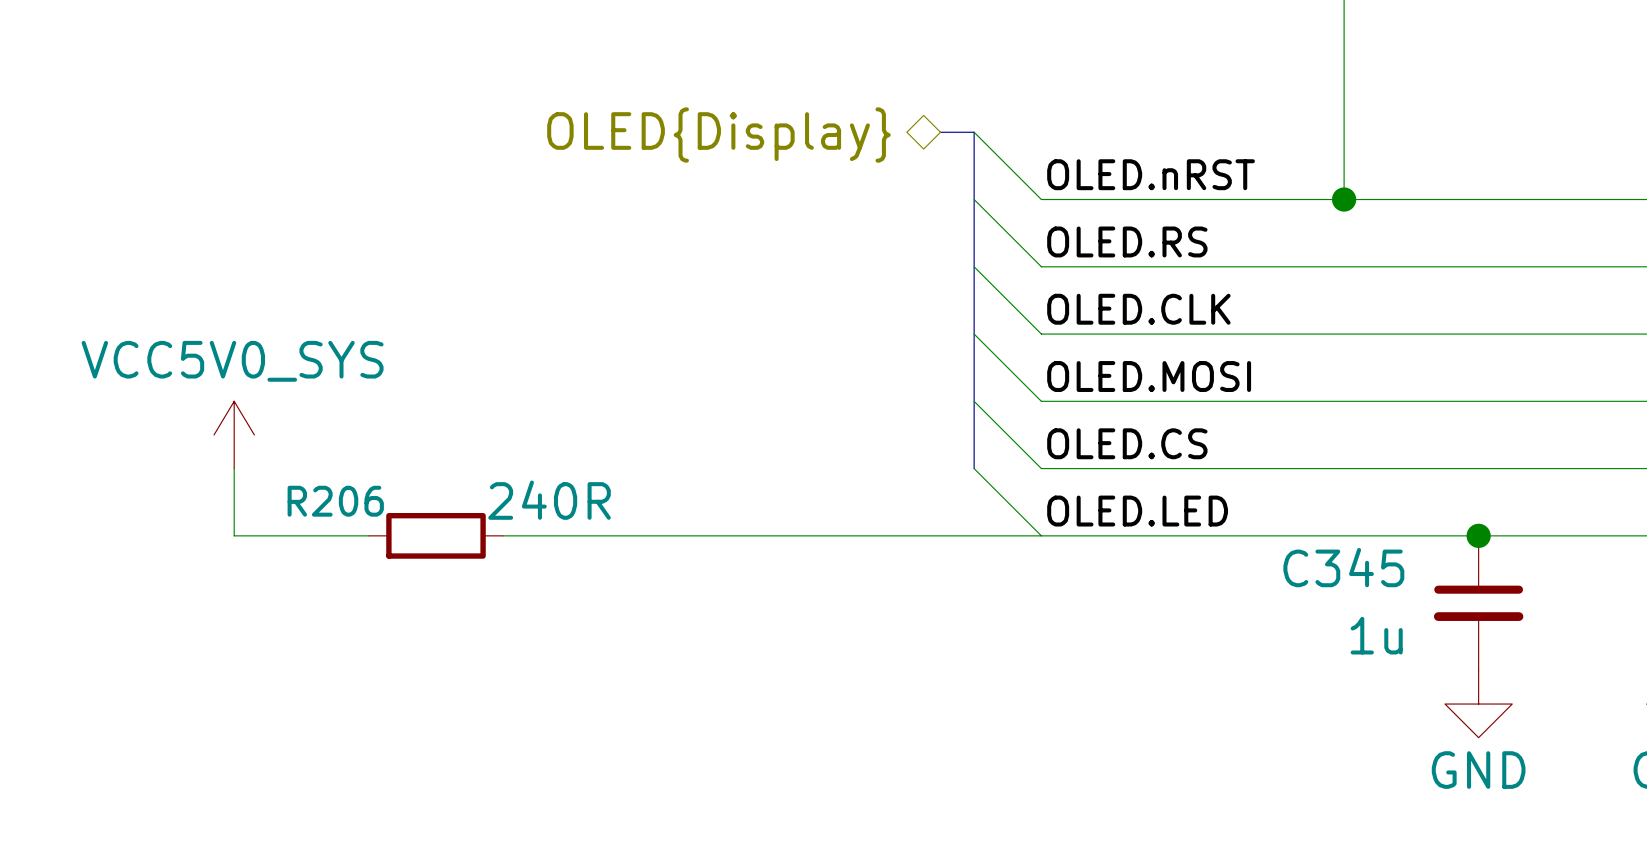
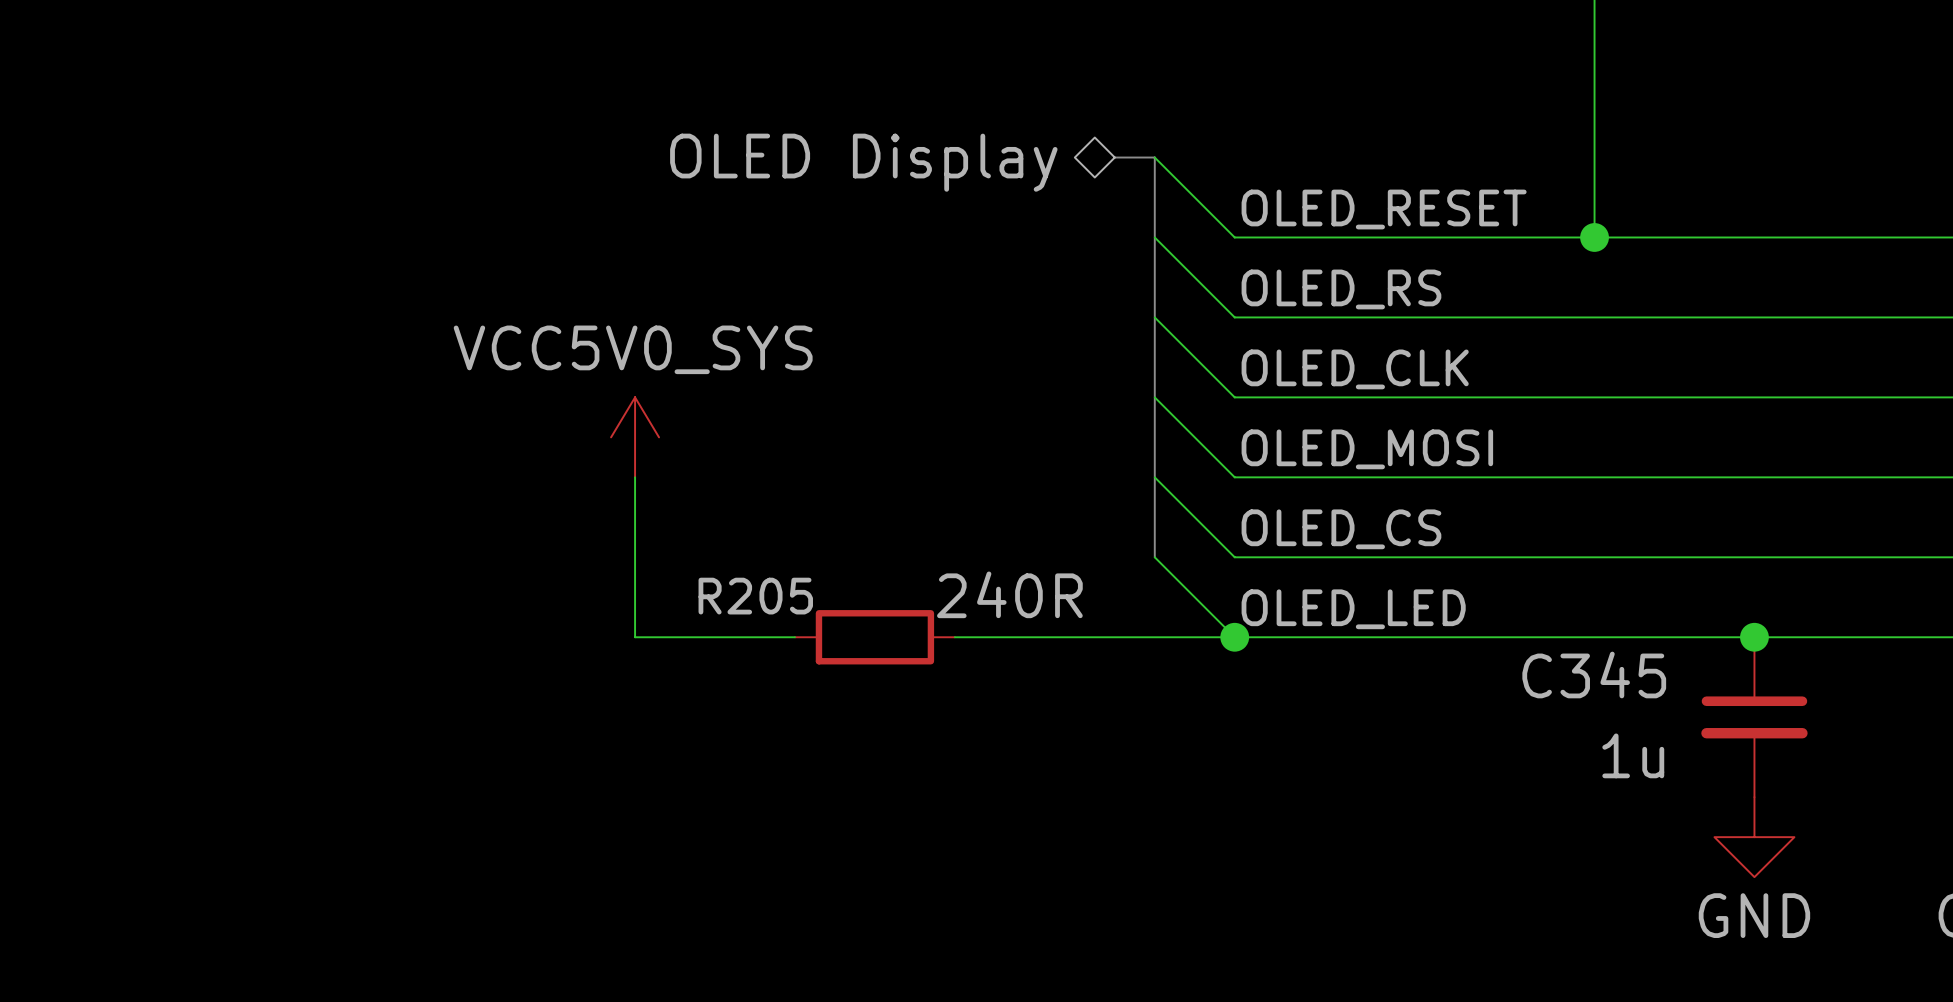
hierarchical label: OLED{Display} (718, 135) -> OLED Display (863, 162)
label: OLED.nRST (1151, 174) -> OLED_RESET (1384, 209)
label: OLED.RS (1127, 241) -> OLED_RS (1341, 289)
label: OLED.CLK (1138, 309) -> OLED_CLK (1355, 369)
label: OLED.MOSI (1149, 376) -> OLED_MOSI (1367, 449)
power symbol position: VCC5V0_SYS (234, 434) -> VCC5V0_SYS (635, 437)
label: OLED.CS (1127, 443) -> OLED_CS (1341, 529)
wire: (234, 468) (234, 535) (368, 535) -> none
label: OLED.LED (1137, 511) -> OLED_LED (1353, 609)
R206: 240R (435, 535) -> none
wire: (503, 535) (536, 535) -> (635, 477) (635, 637)
wire: (671, 535) (805, 535) -> none
R205: none -> 240R (874, 637)
junction: none -> (1234, 637)

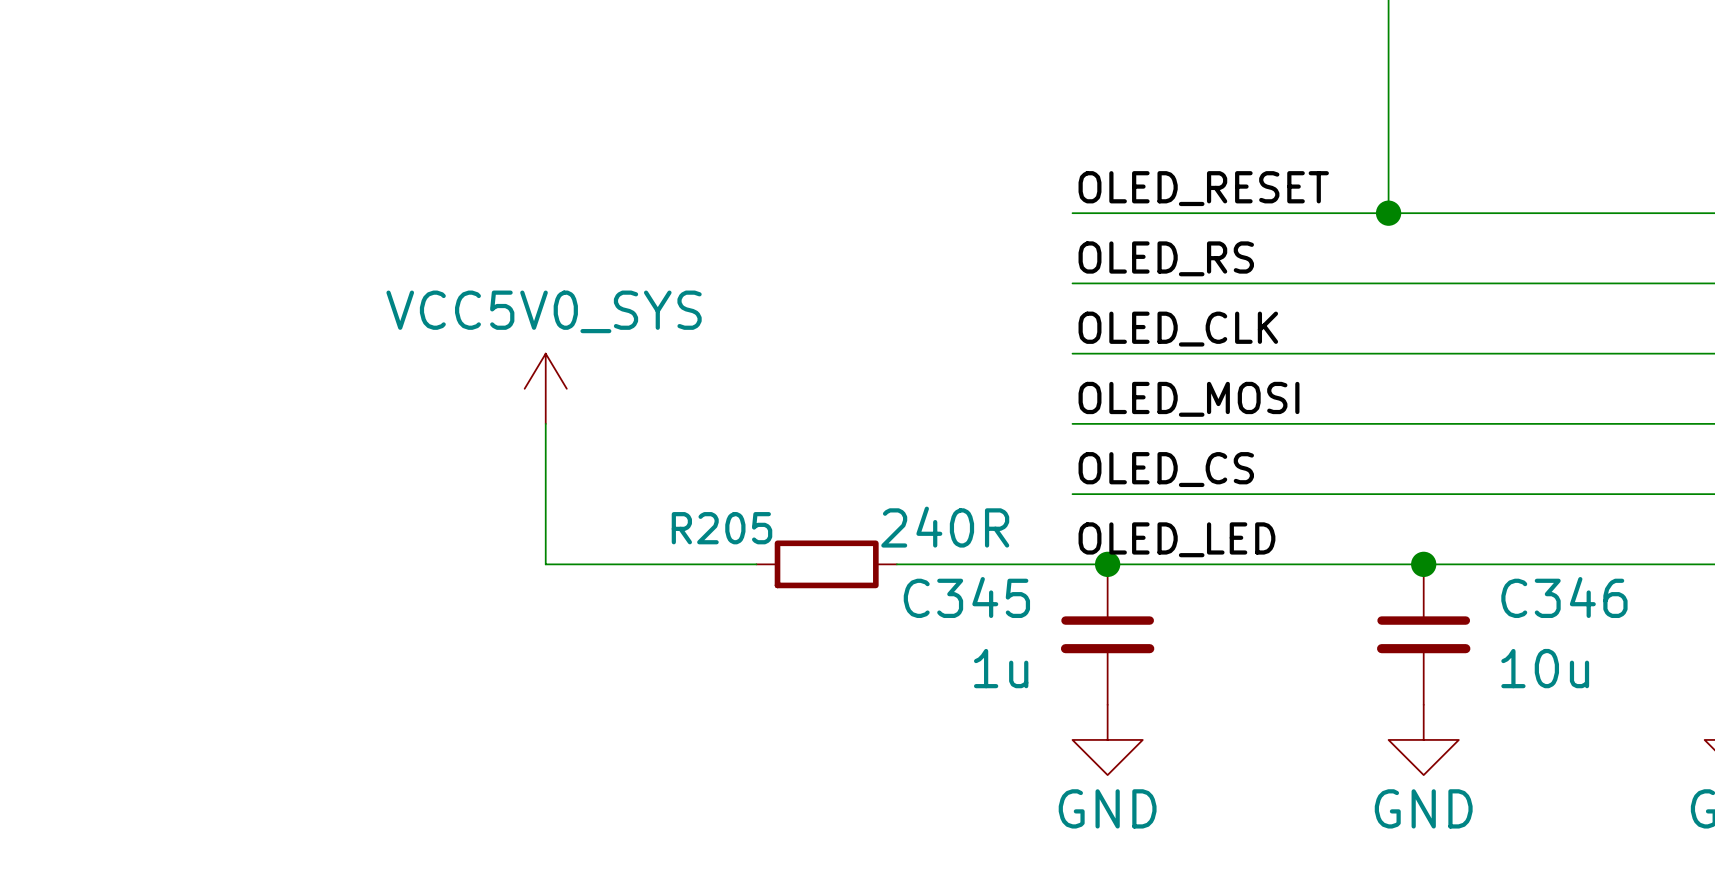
bus: (1114, 157) (1154, 157) (1154, 557) -> none
wire: (1154, 157) (1234, 237) -> none
hierarchical label: OLED Display (863, 162) -> none
wire: (1154, 237) (1234, 317) -> none
wire: (1154, 317) (1234, 397) -> none
wire: (1154, 397) (1234, 477) -> none
wire: (1154, 477) (1234, 557) -> none
wire: (1154, 557) (1234, 637) -> none
R205 position: (874, 637) -> (826, 564)
wire: (954, 637) (1034, 637) -> (686, 564) (756, 564)
junction position: (1234, 637) -> (1107, 564)
junction position: (1754, 637) -> (1423, 564)
C346: none -> 10u (1423, 634)
C345 position: (1754, 717) -> (1107, 634)
power symbol: none -> GND (1107, 739)
power symbol position: GND (1754, 837) -> GND (1423, 739)

